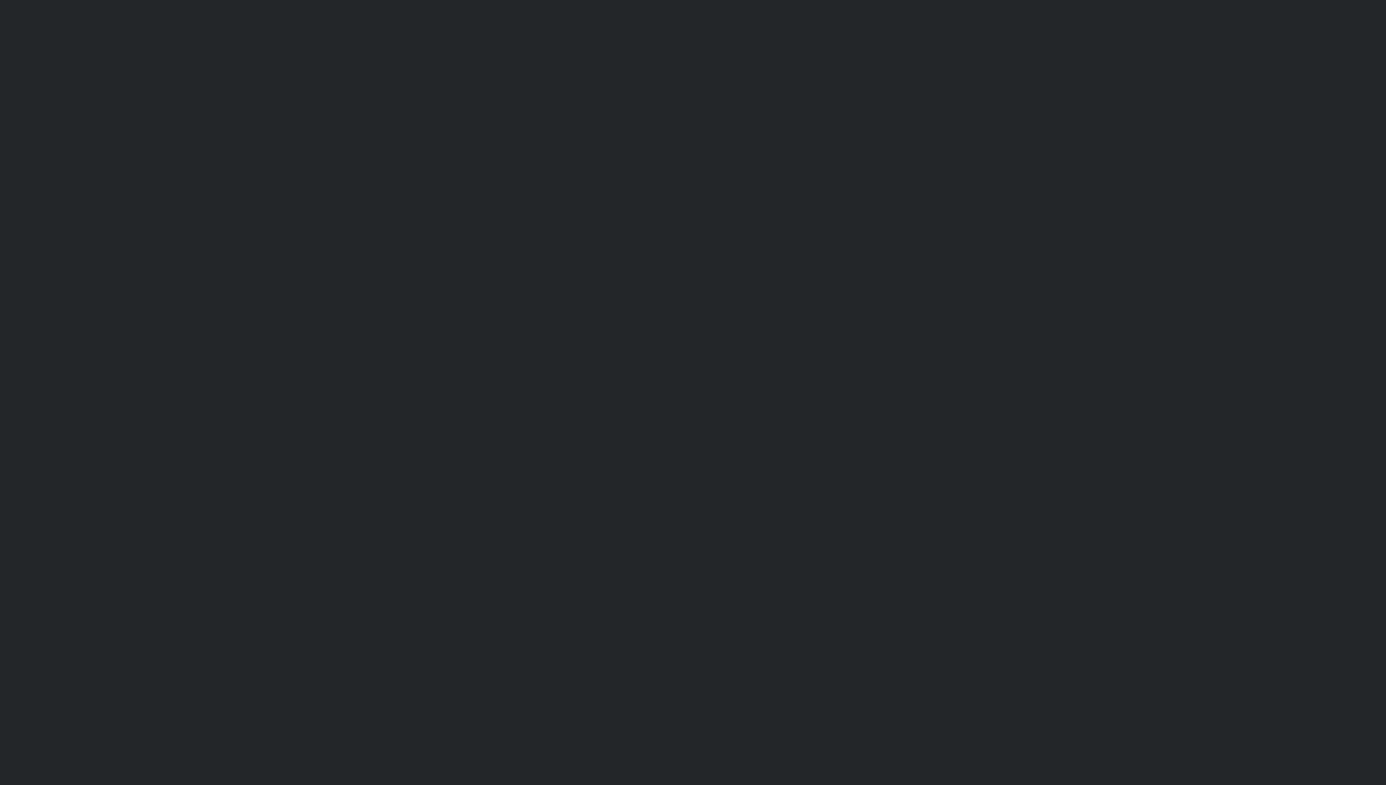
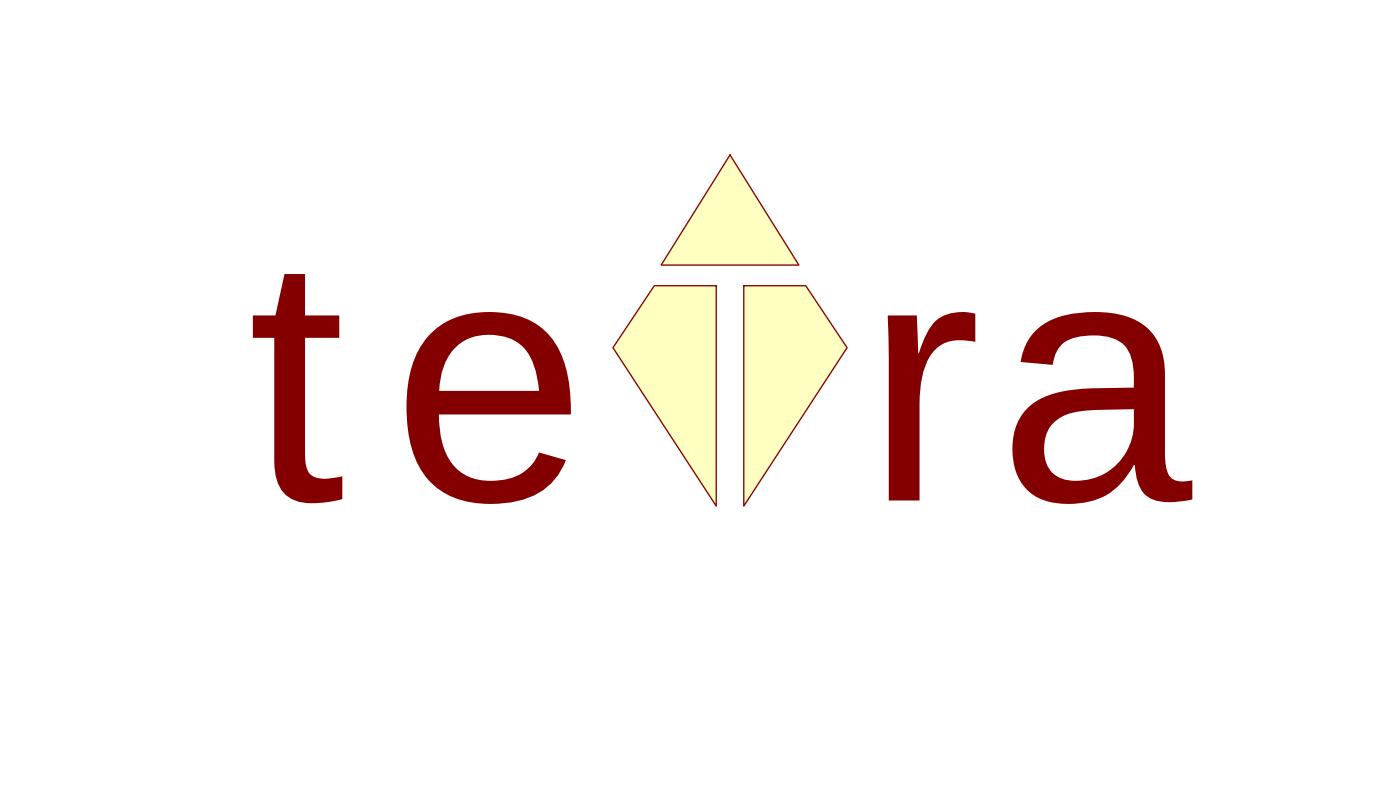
part: none -> (730, 330)

